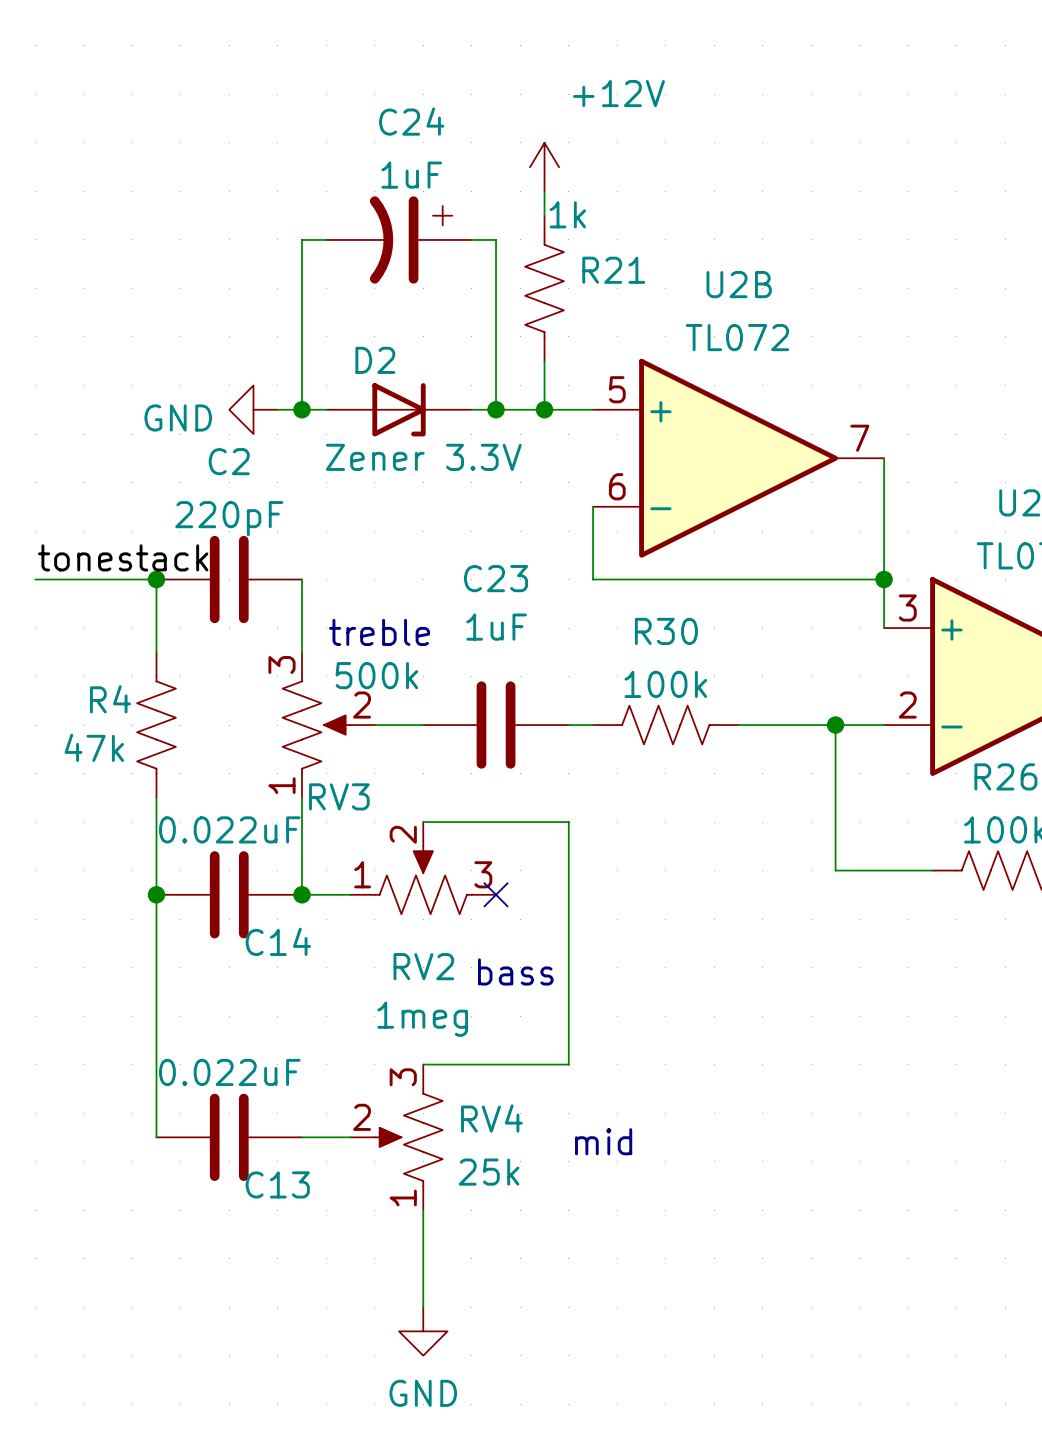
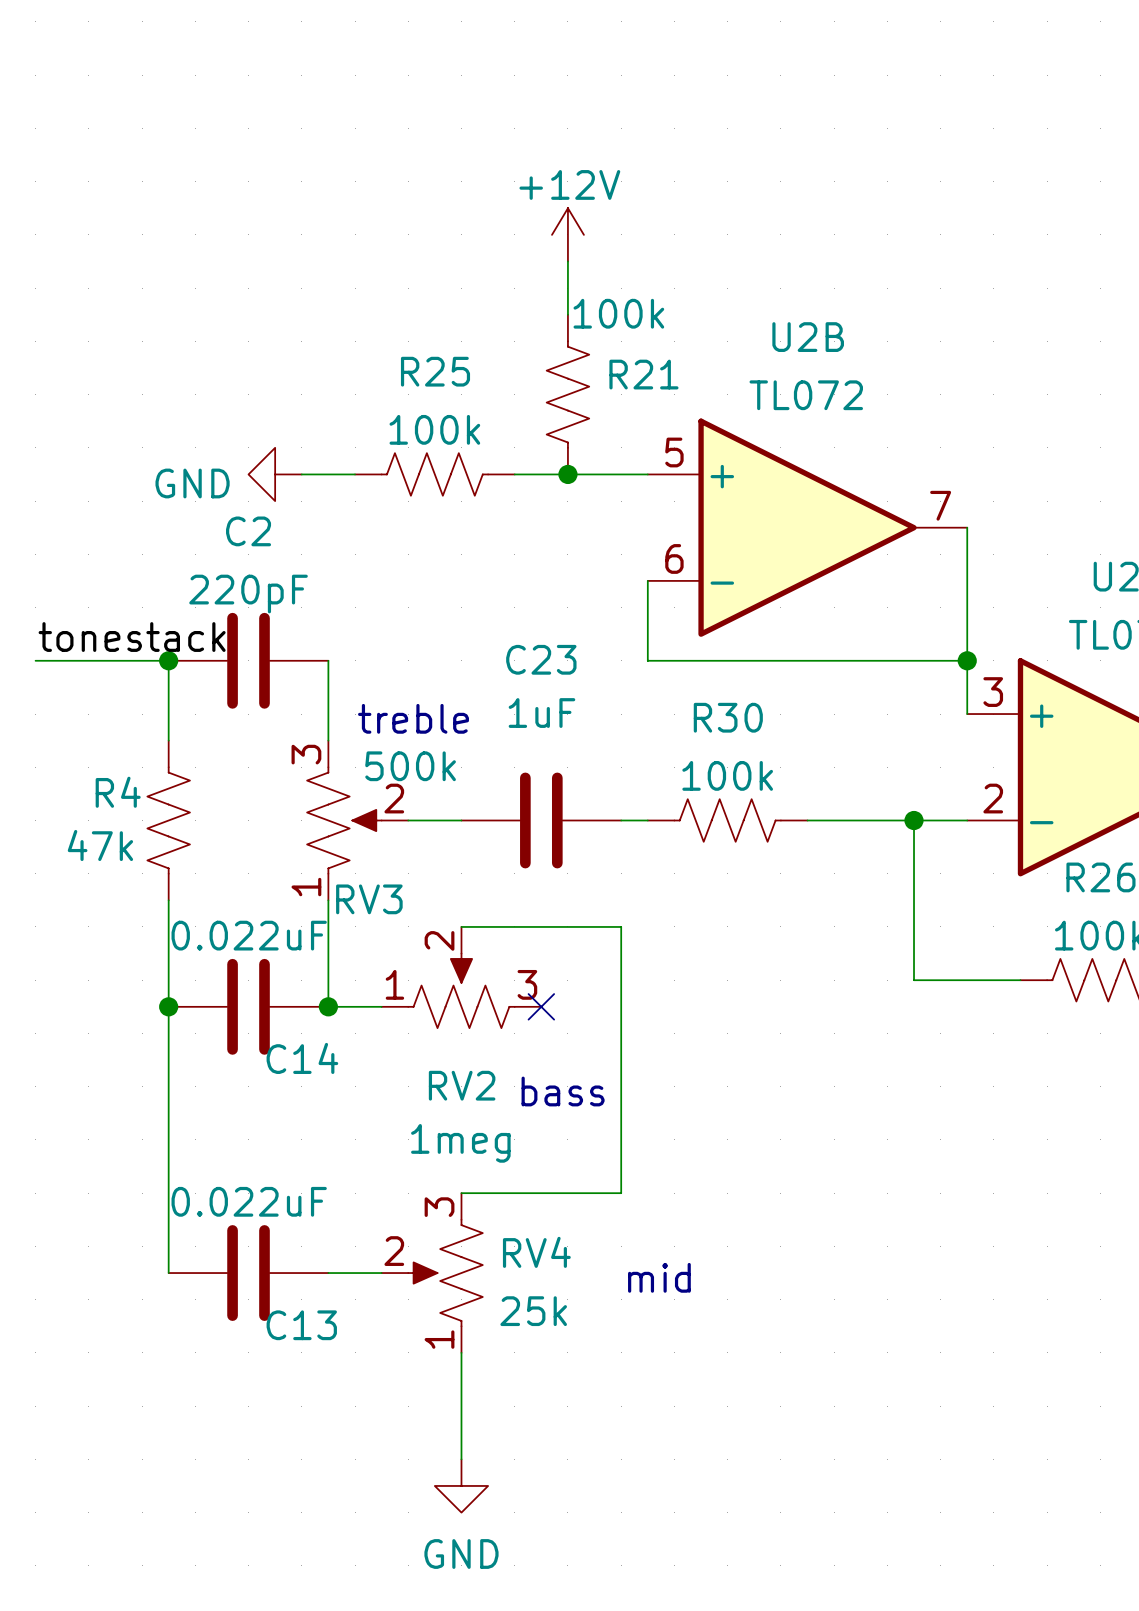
power symbol text position: +12V (619, 93) -> +12V (569, 184)
power symbol position: +12V (544, 167) -> +12V (567, 234)
wire: (544, 191) (544, 215) -> none
R21 value: 1k (567, 214) -> 100k (618, 313)
wire: (326, 239) (302, 239) (302, 409) -> none
C24: 1uF (399, 239) -> none
wire: (471, 239) (496, 239) (496, 409) -> none
R21 position: (544, 288) -> (567, 394)
wire: (544, 361) (544, 409) -> (567, 261) (567, 314)
junction: (302, 409) -> none
D2: Zener 3.3V (399, 409) -> none
R25: none -> 100k (434, 474)
junction: (496, 409) -> none
junction: none -> (567, 474)
junction: (544, 409) -> none

